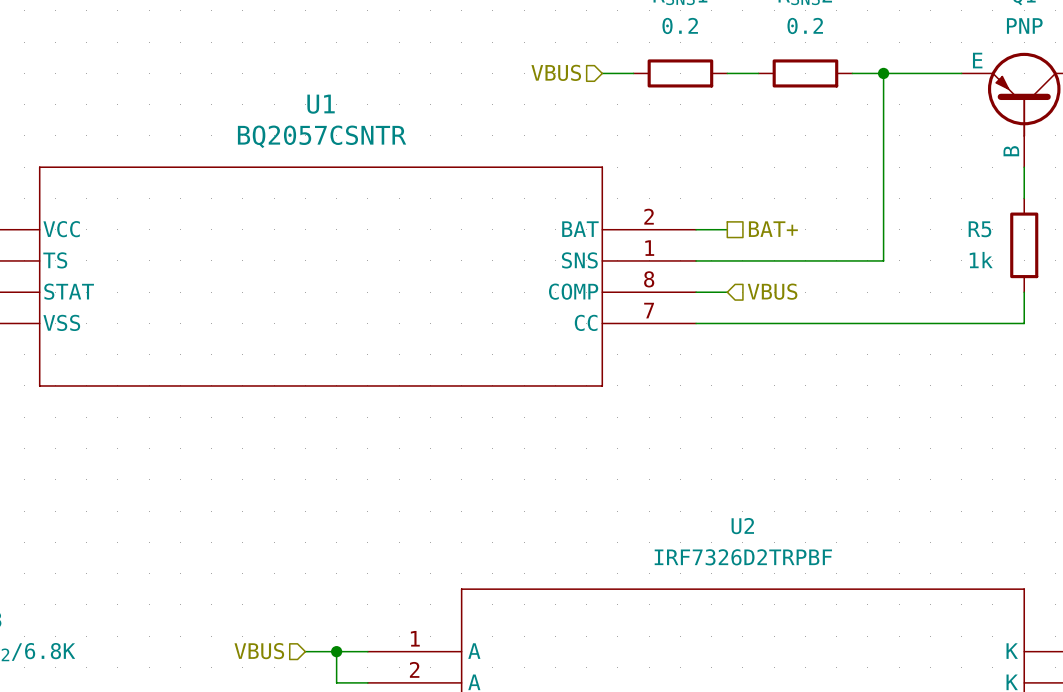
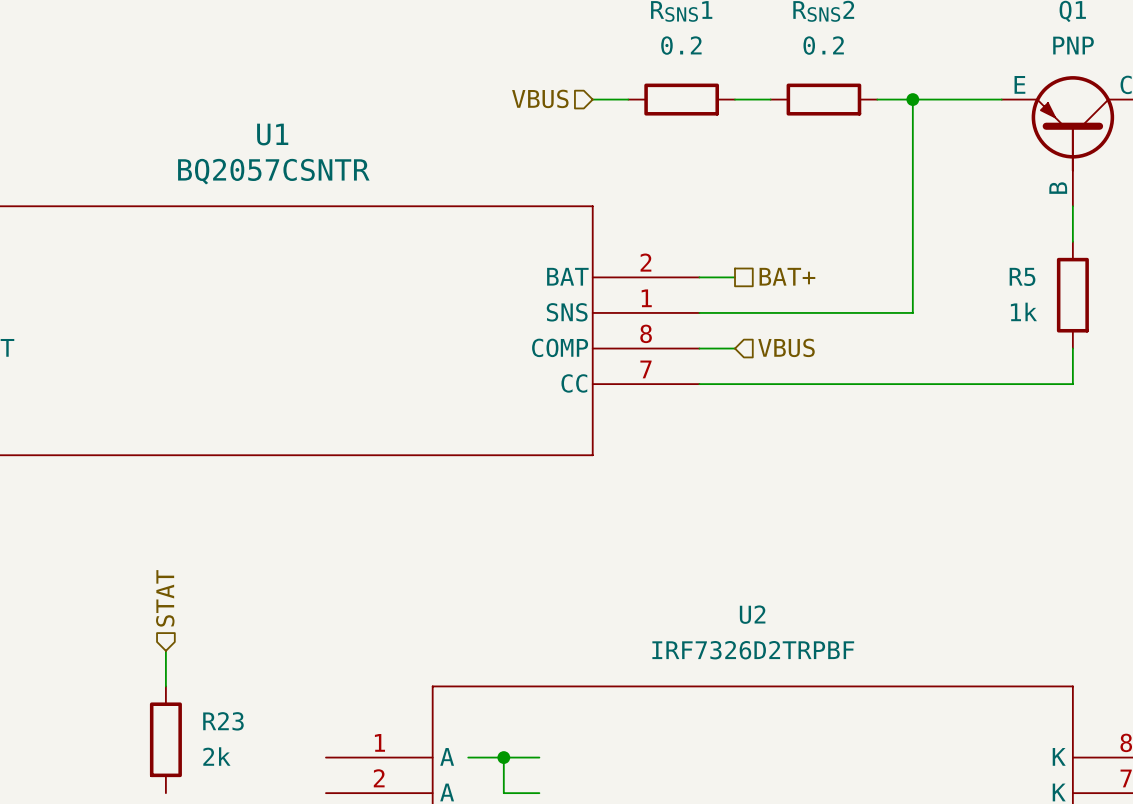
hierarchical label: none -> STAT (165, 598)
wire: none -> (165, 650) (165, 686)
R23: none -> 2k (165, 739)
hierarchical label: VBUS (259, 651) -> none
wire: (305, 651) (367, 651) -> (468, 757) (539, 757)
wire: (336, 651) (336, 682) (367, 682) -> (503, 757) (503, 793) (539, 793)
junction: (336, 651) -> none
junction: none -> (503, 757)

